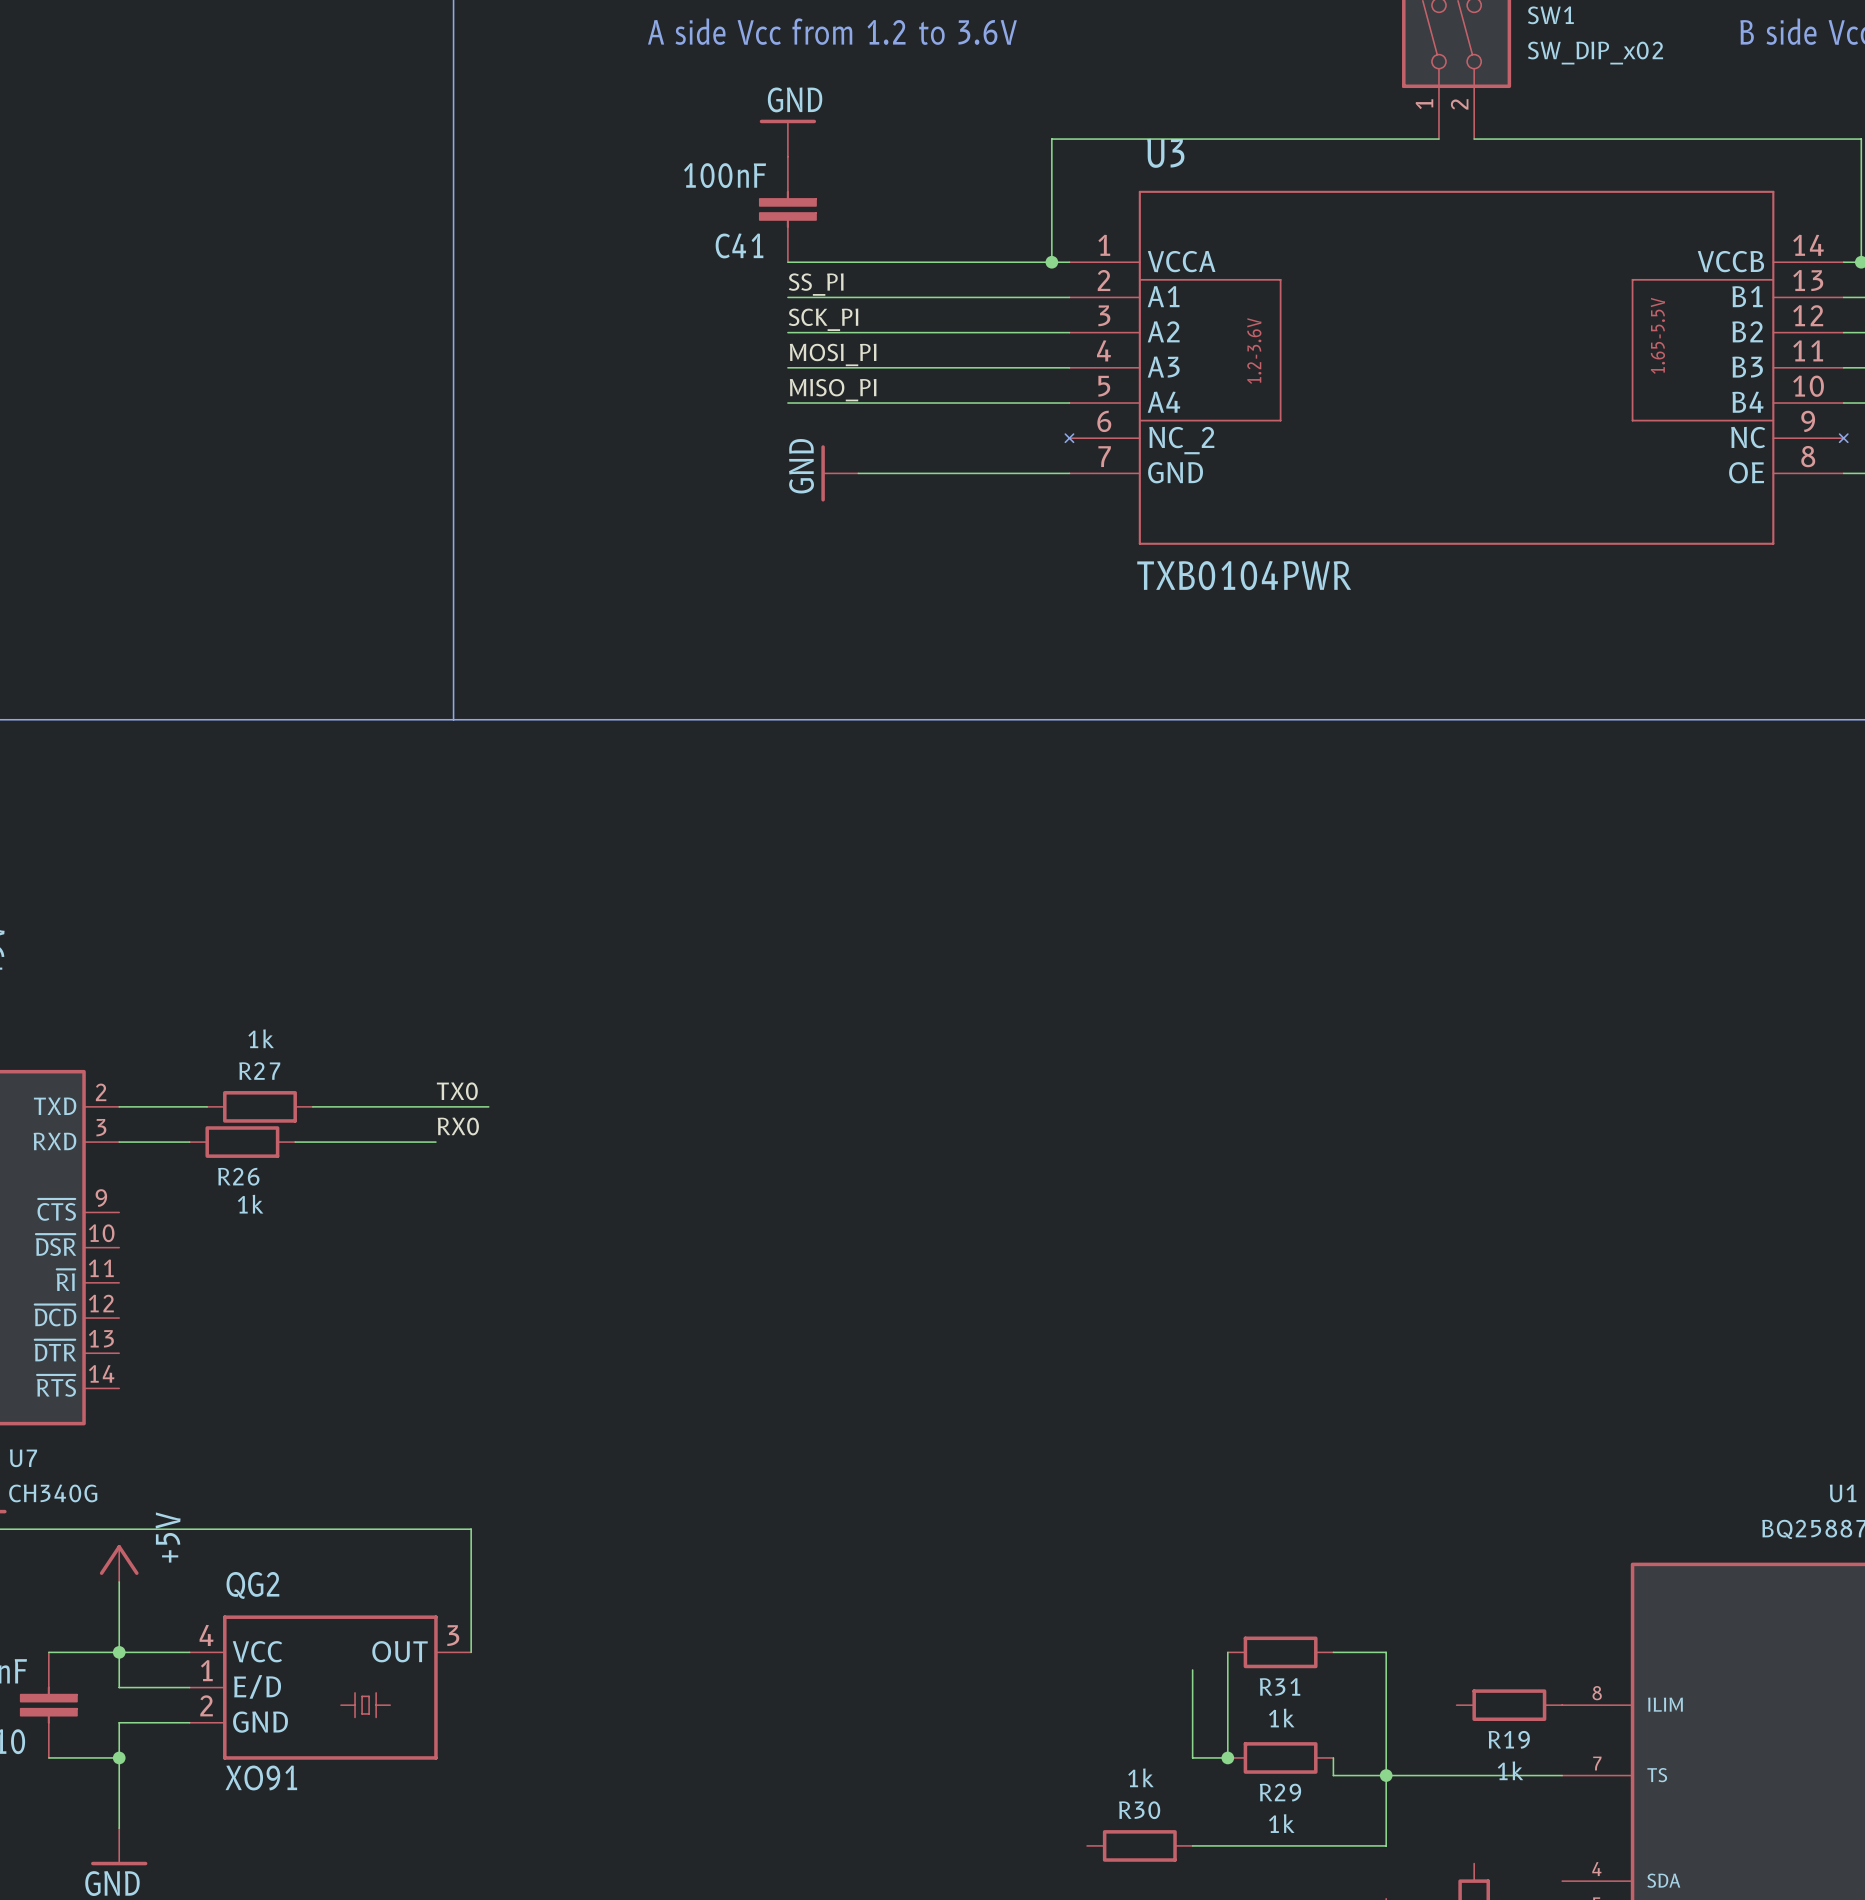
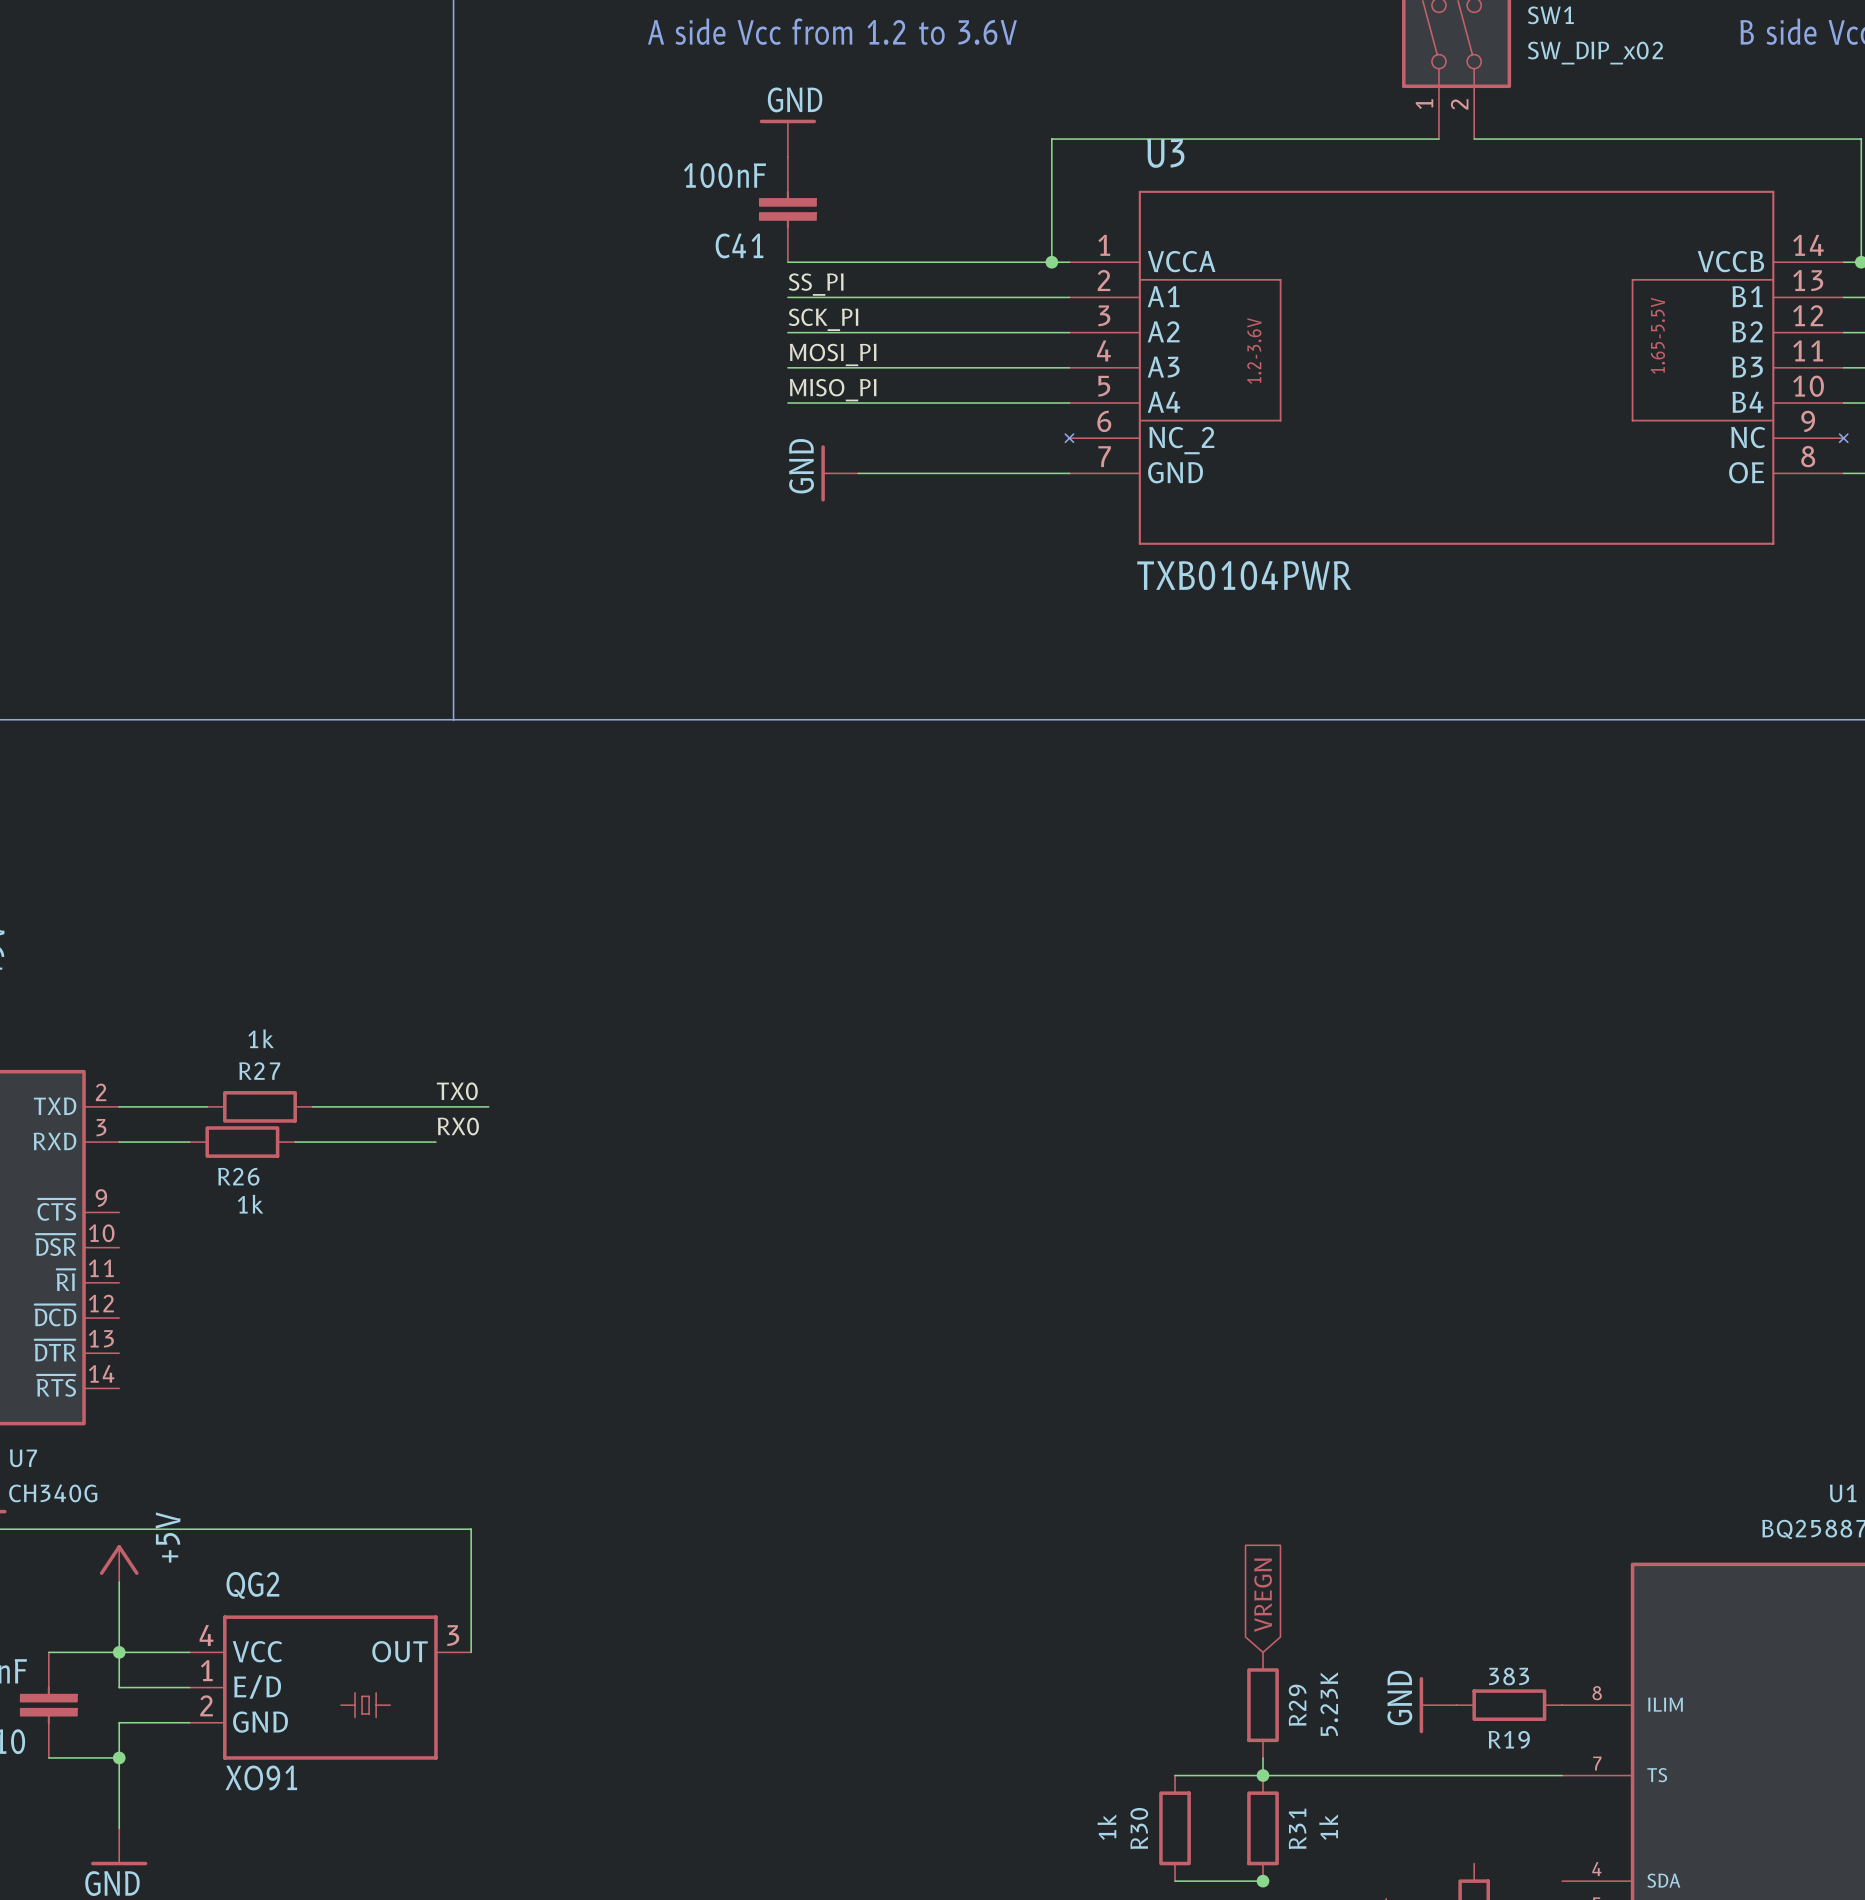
global label: none -> VREGN (1263, 1595)
wire: (1227, 1652) (1227, 1757) (1192, 1757) (1192, 1669) -> none
R31 rotation: 0° (1280, 1652) -> 90° clockwise (1263, 1828)
R31 position: (1280, 1652) -> (1263, 1828)
wire: (1333, 1652) (1386, 1652) (1386, 1845) (1192, 1845) -> none
R31 name position: R31 (1280, 1686) -> R31 (1297, 1828)
power symbol: none -> GND (1438, 1705)
R31 value position: 1k (1281, 1718) -> 1k (1328, 1827)
junction position: (1227, 1757) -> (1263, 1775)
wire: none -> (1263, 1757) (1263, 1775)
R29 rotation: 0° (1280, 1757) -> 90° clockwise (1263, 1705)
wire: (1333, 1757) (1333, 1775) -> (1175, 1775) (1333, 1775)
R19 value: 1k (1510, 1770) -> 383 (1509, 1676)
junction: (1386, 1775) -> none
R30 value position: 1k (1140, 1777) -> 1k (1106, 1827)
R29 name position: R29 (1280, 1792) -> R29 (1297, 1705)
R30 name position: R30 (1139, 1810) -> R30 (1139, 1828)
R29 value: 1k (1281, 1823) -> 5.23K (1329, 1704)
R30 rotation: 0° (1139, 1845) -> 90° clockwise (1175, 1828)
wire: none -> (1175, 1881) (1263, 1881)
junction: none -> (1263, 1881)

